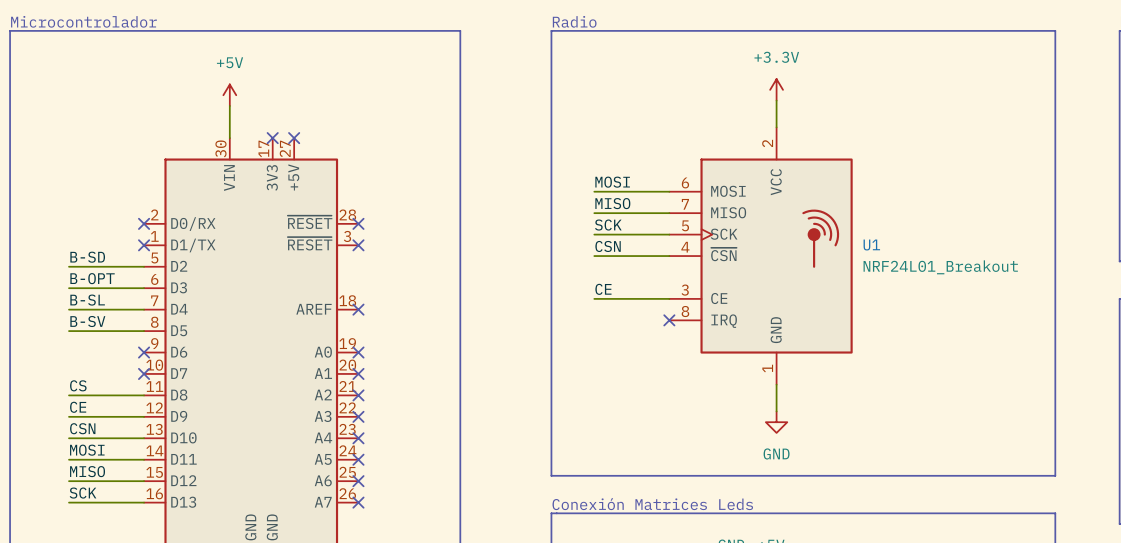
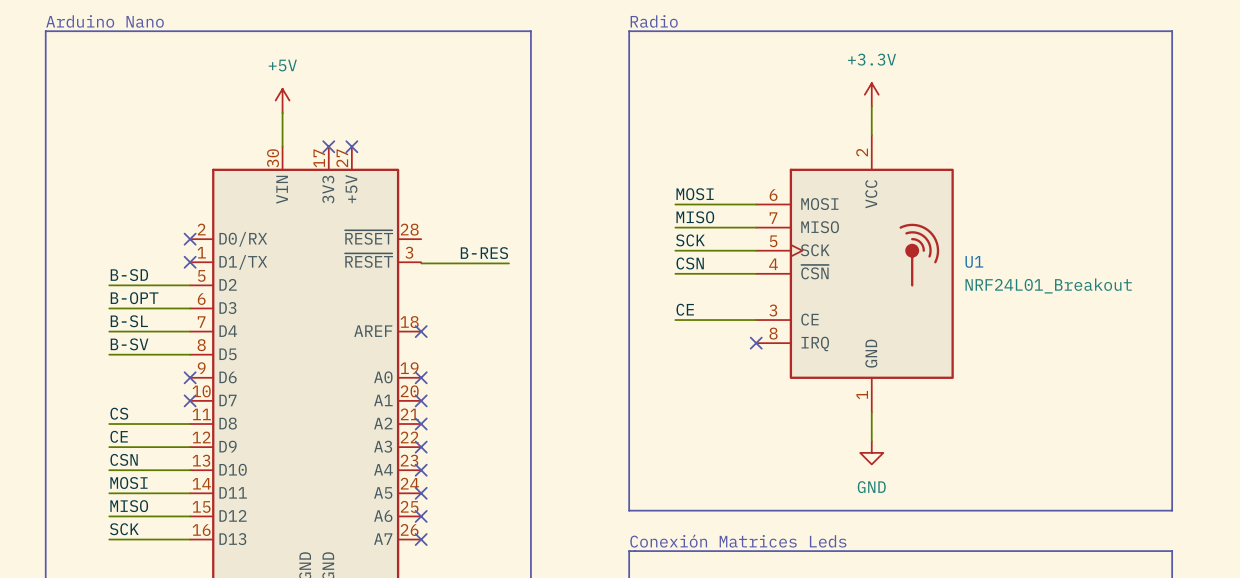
text: Microcontrolador (83, 21) -> Arduino Nano (105, 21)
no-connect mark: (358, 223) -> none
label: none -> B-RES (484, 253)
no-connect mark: (358, 245) -> none
wire: none -> (421, 263) (509, 263)

